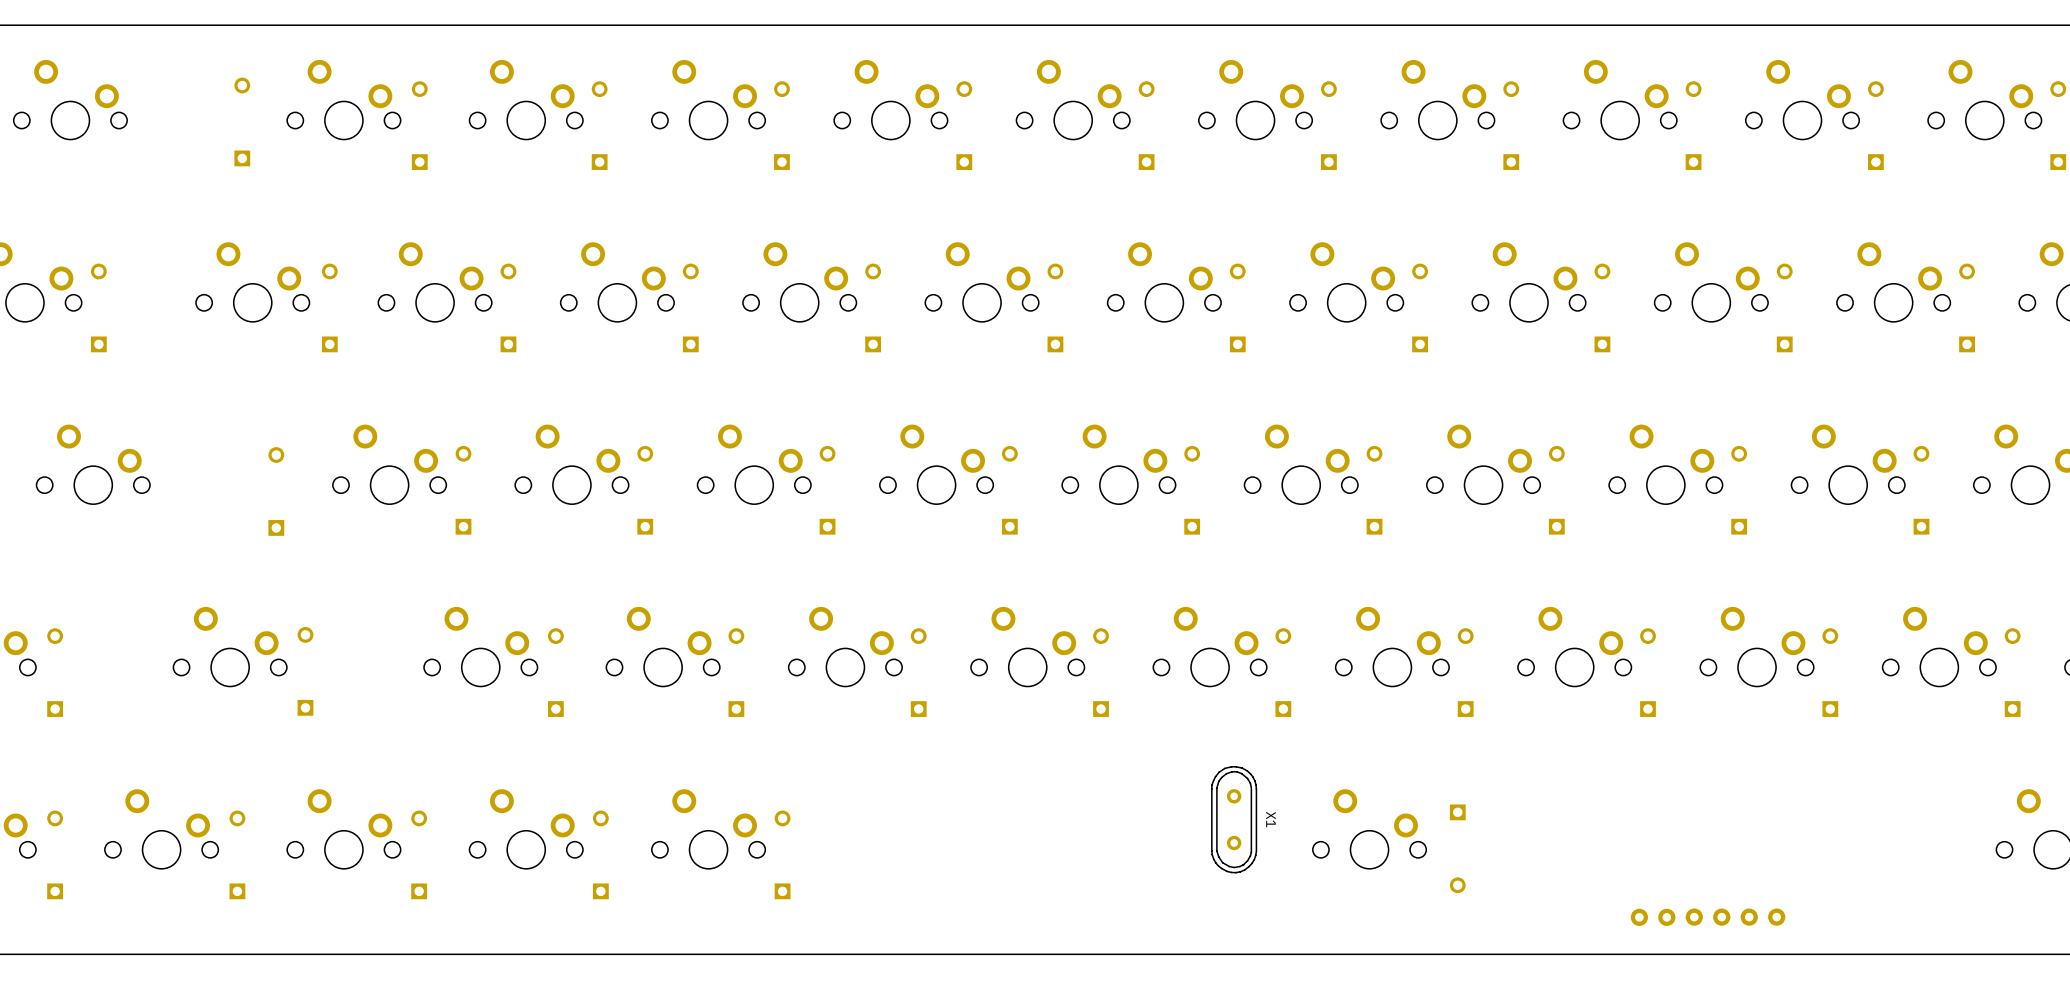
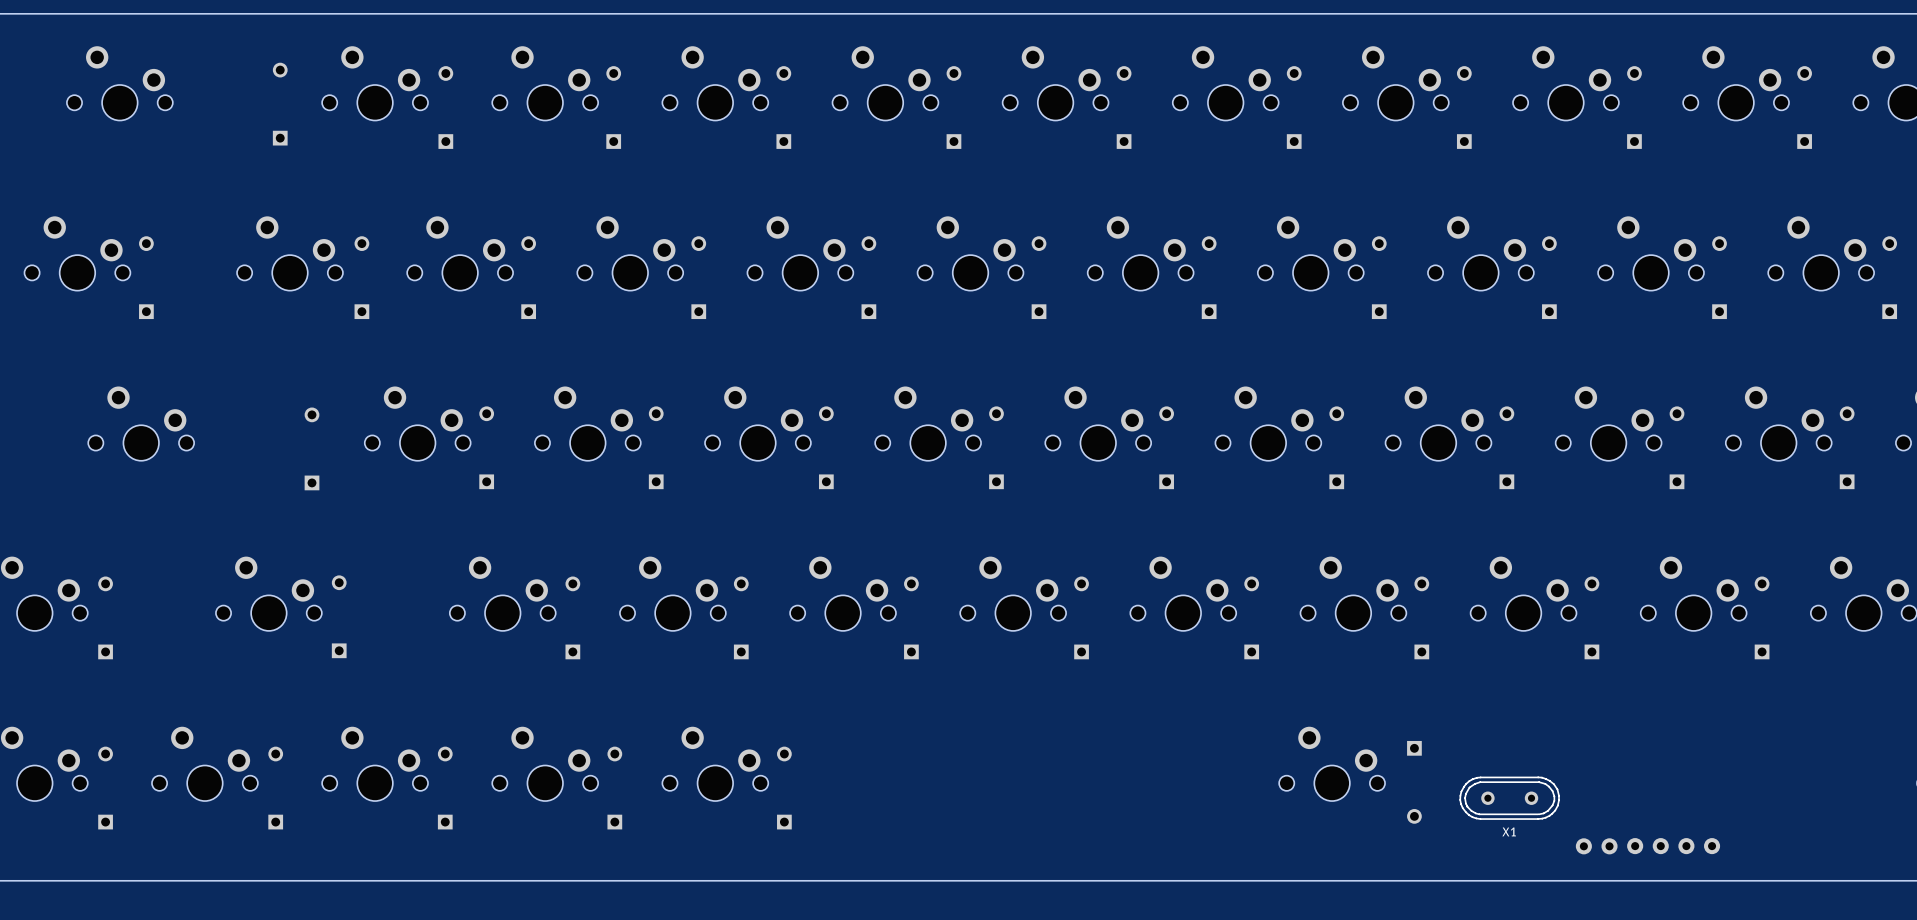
X1 rotation: 0° (1234, 819) -> 90° clockwise (1509, 798)
X1 position: (1234, 819) -> (1509, 798)

